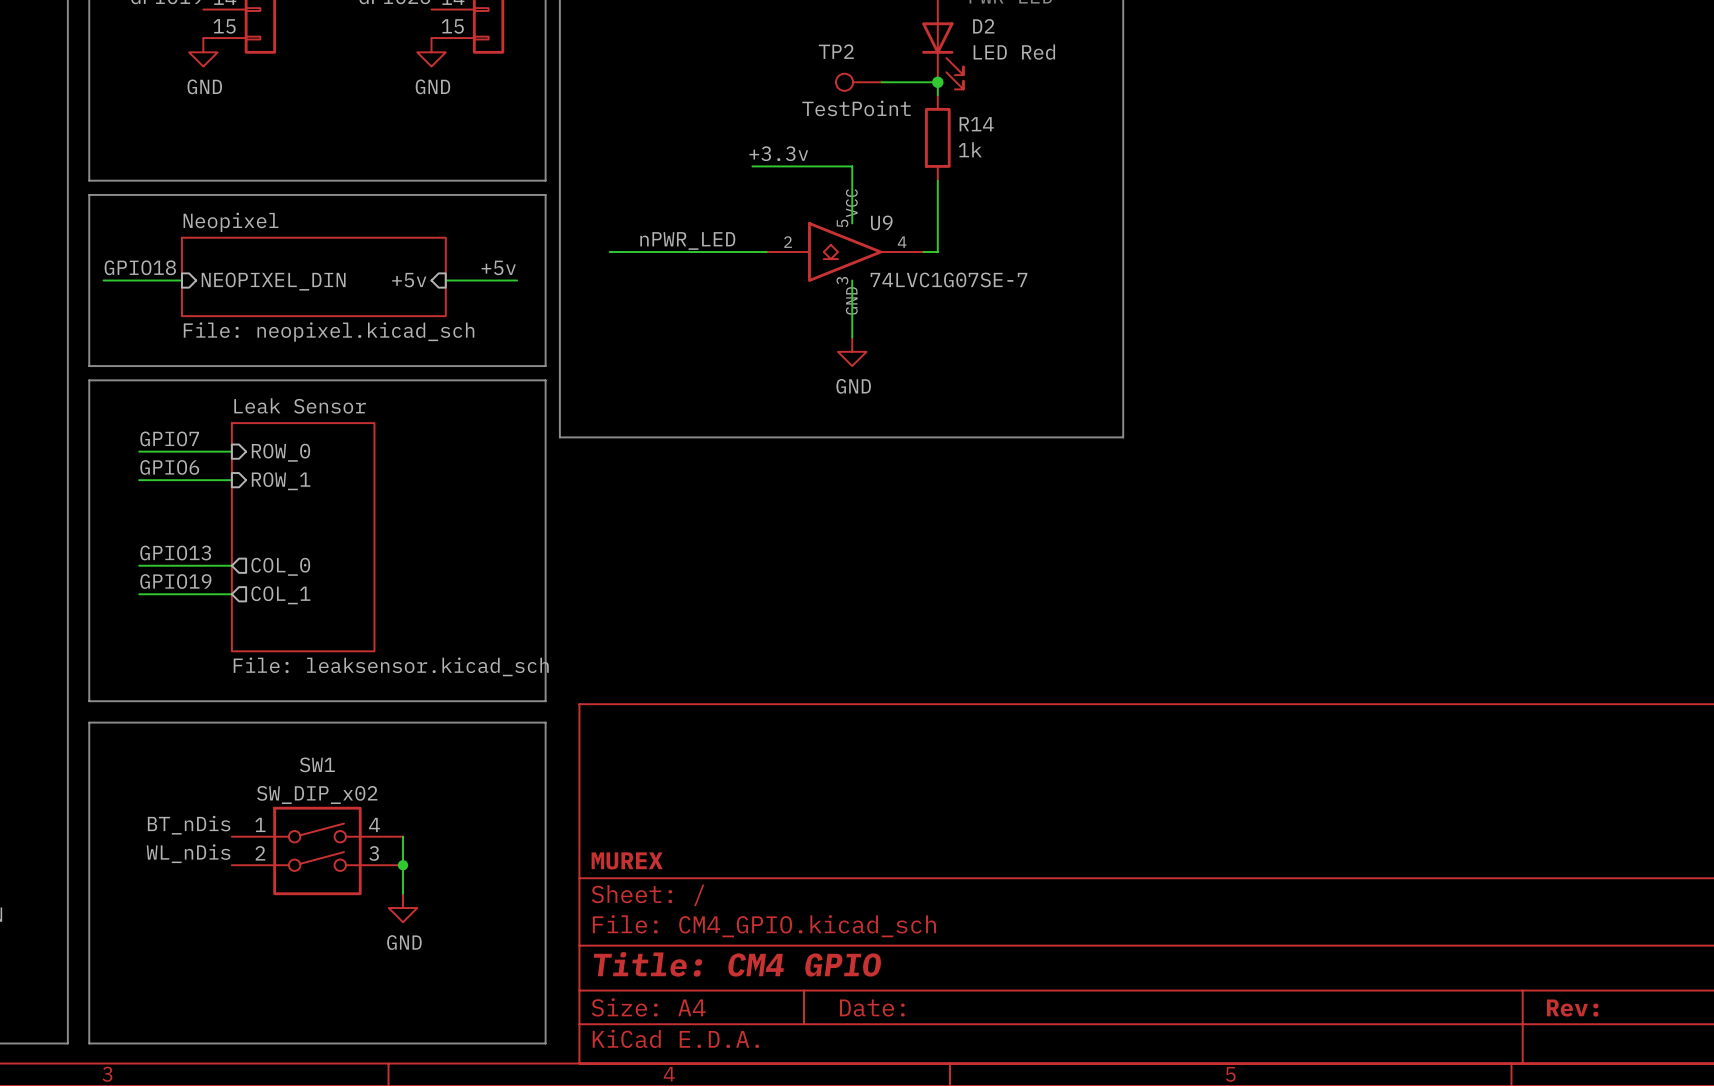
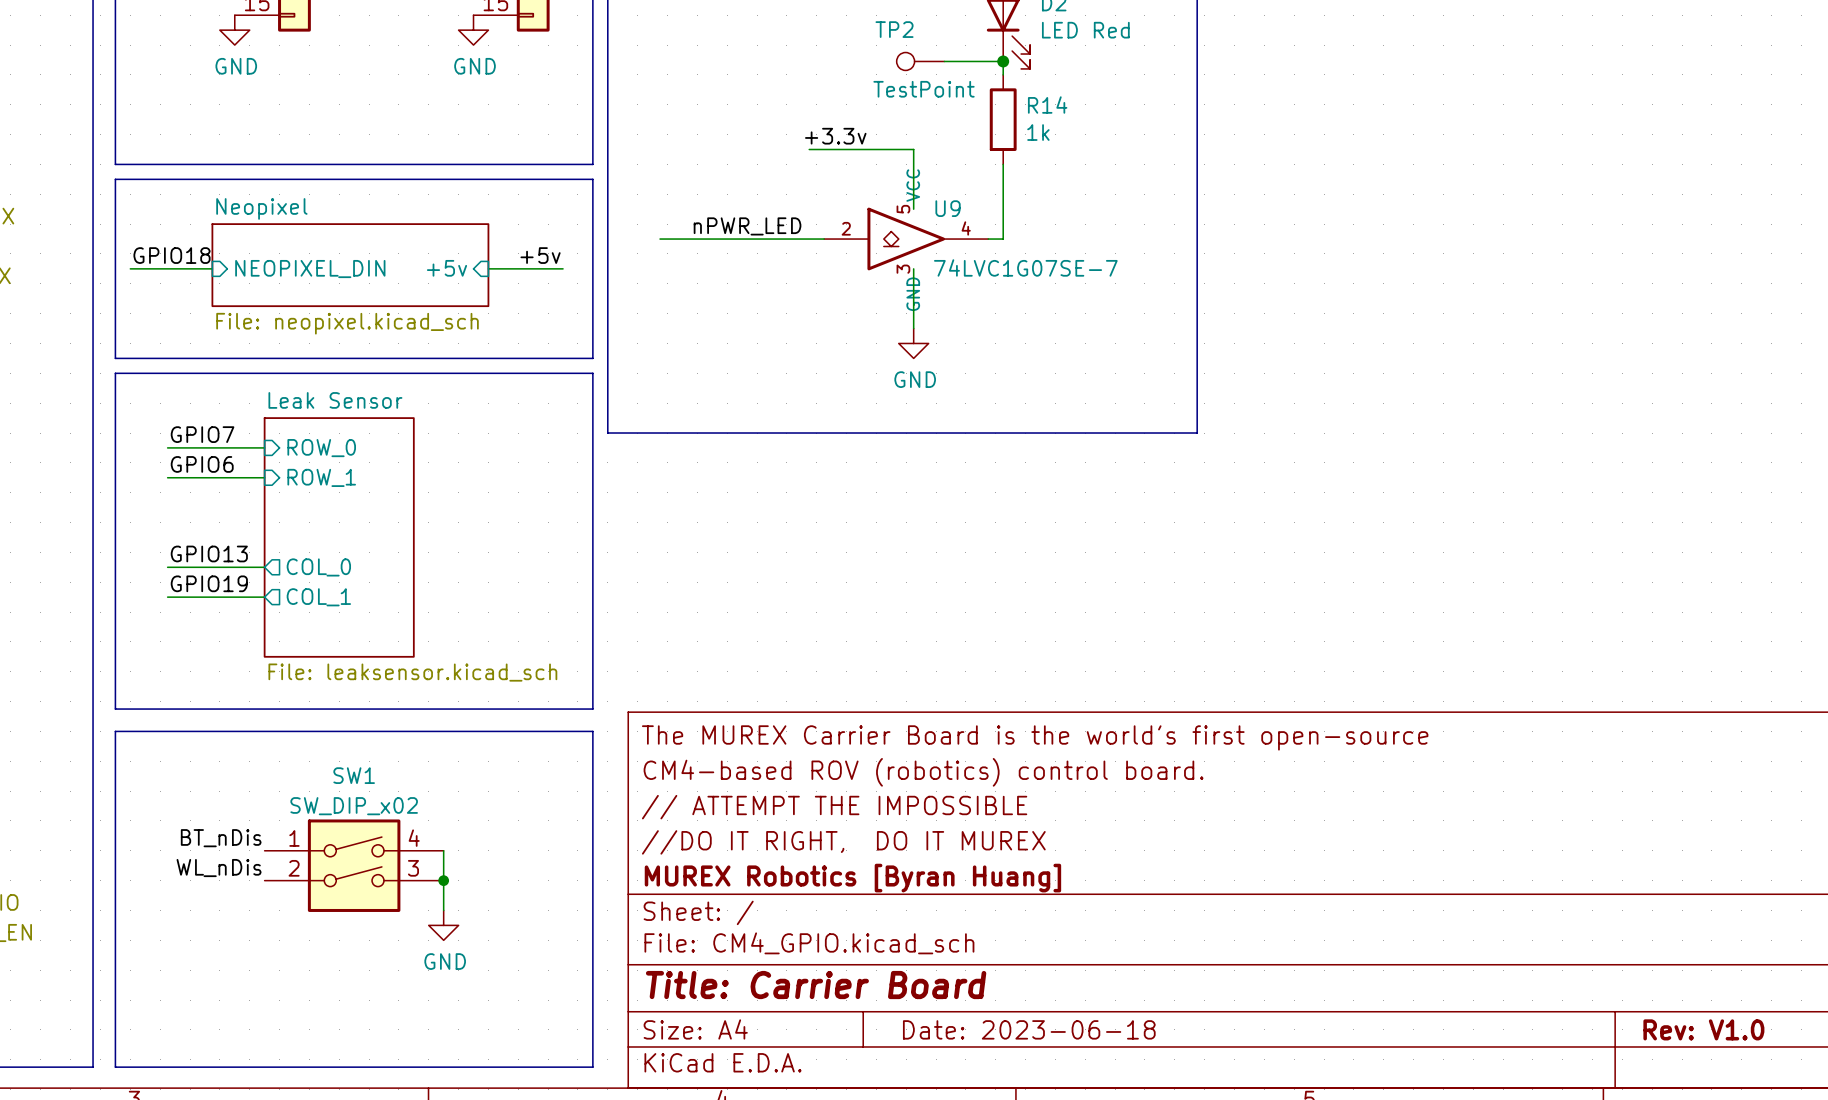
title block: none -> The MUREX Carrier Board is the world's first open-source (1035, 737)
title block: none -> CM4-based ROV (robotics) control board. (923, 772)
title block: none -> // ATTEMPT THE IMPOSSIBLE (834, 807)
title block: none -> //DO IT RIGHT, DO IT MUREX (843, 842)
title block: MUREX (627, 860) -> MUREX Robotics [Byran Huang] (852, 878)
title block: Title: CM4 GPIO (737, 964) -> Title: Carrier Board (816, 985)
title block: Date: (872, 1008) -> Date: 2023-06-18 (1029, 1029)
title block: Rev: (1572, 1008) -> Rev: V1.0 (1703, 1029)

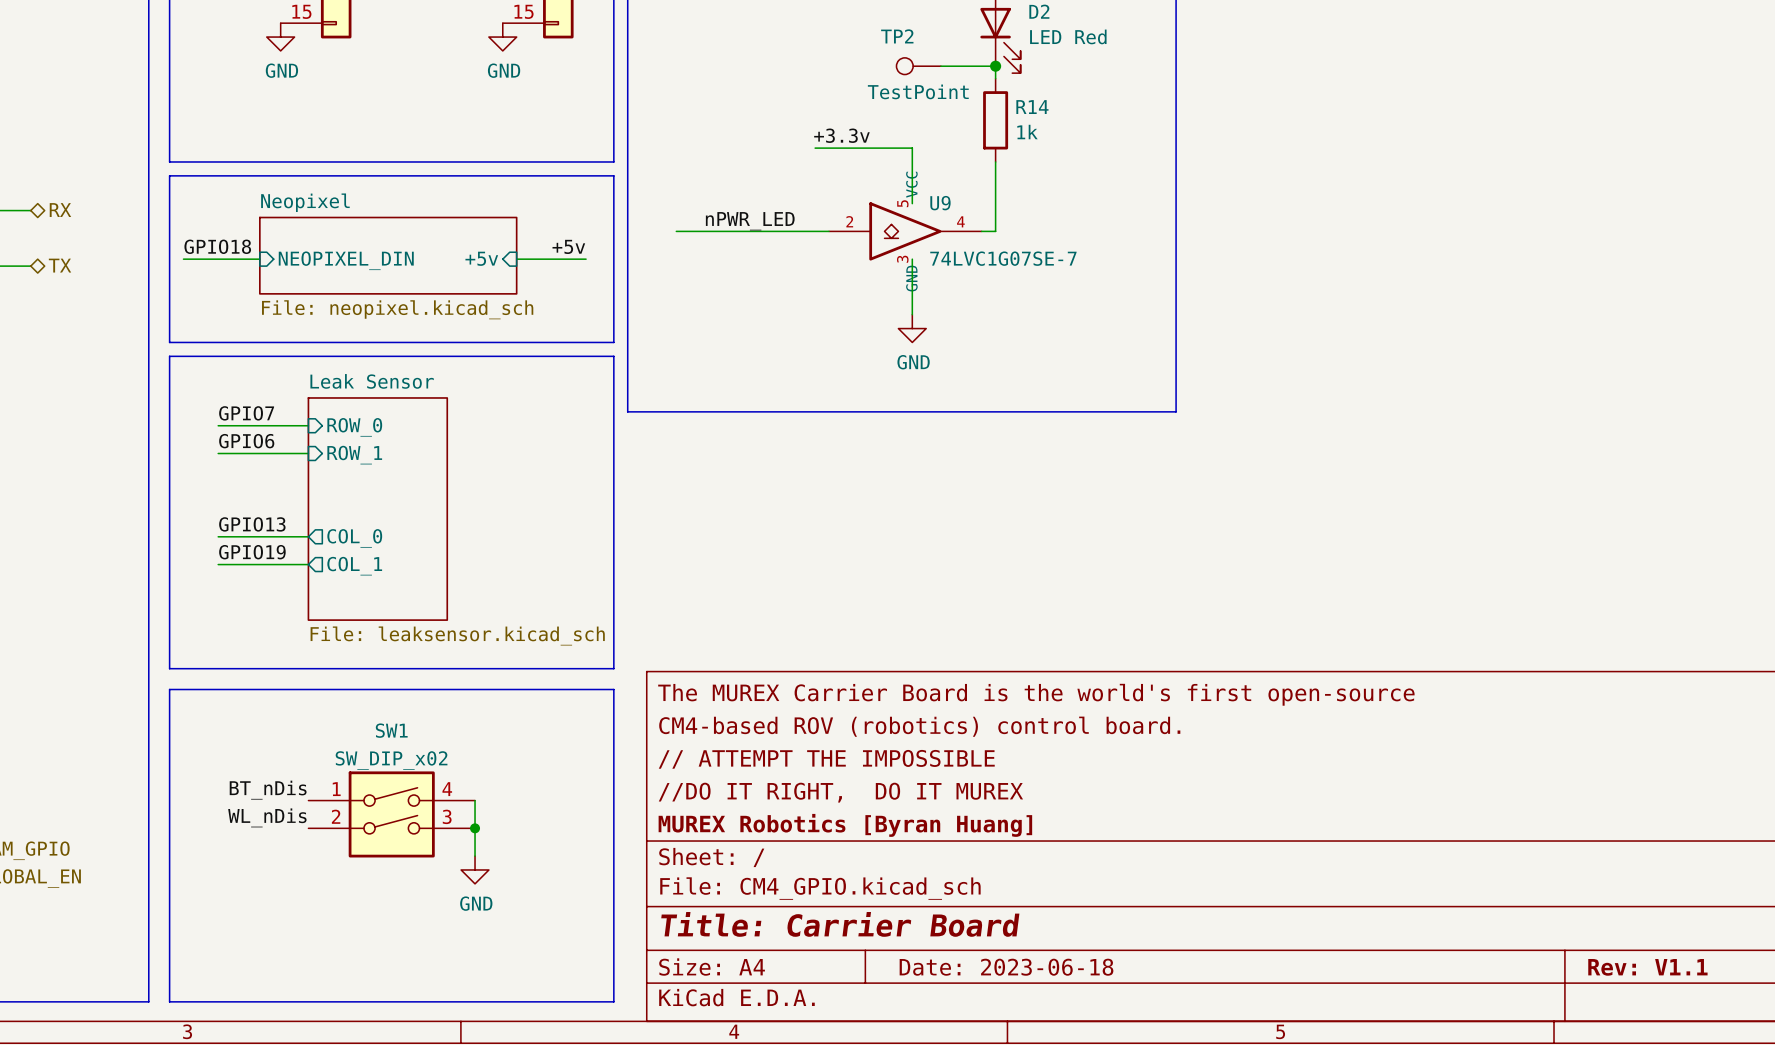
title block: Rev: V1.0 (1703, 1029) -> Rev: V1.1 (1647, 967)

